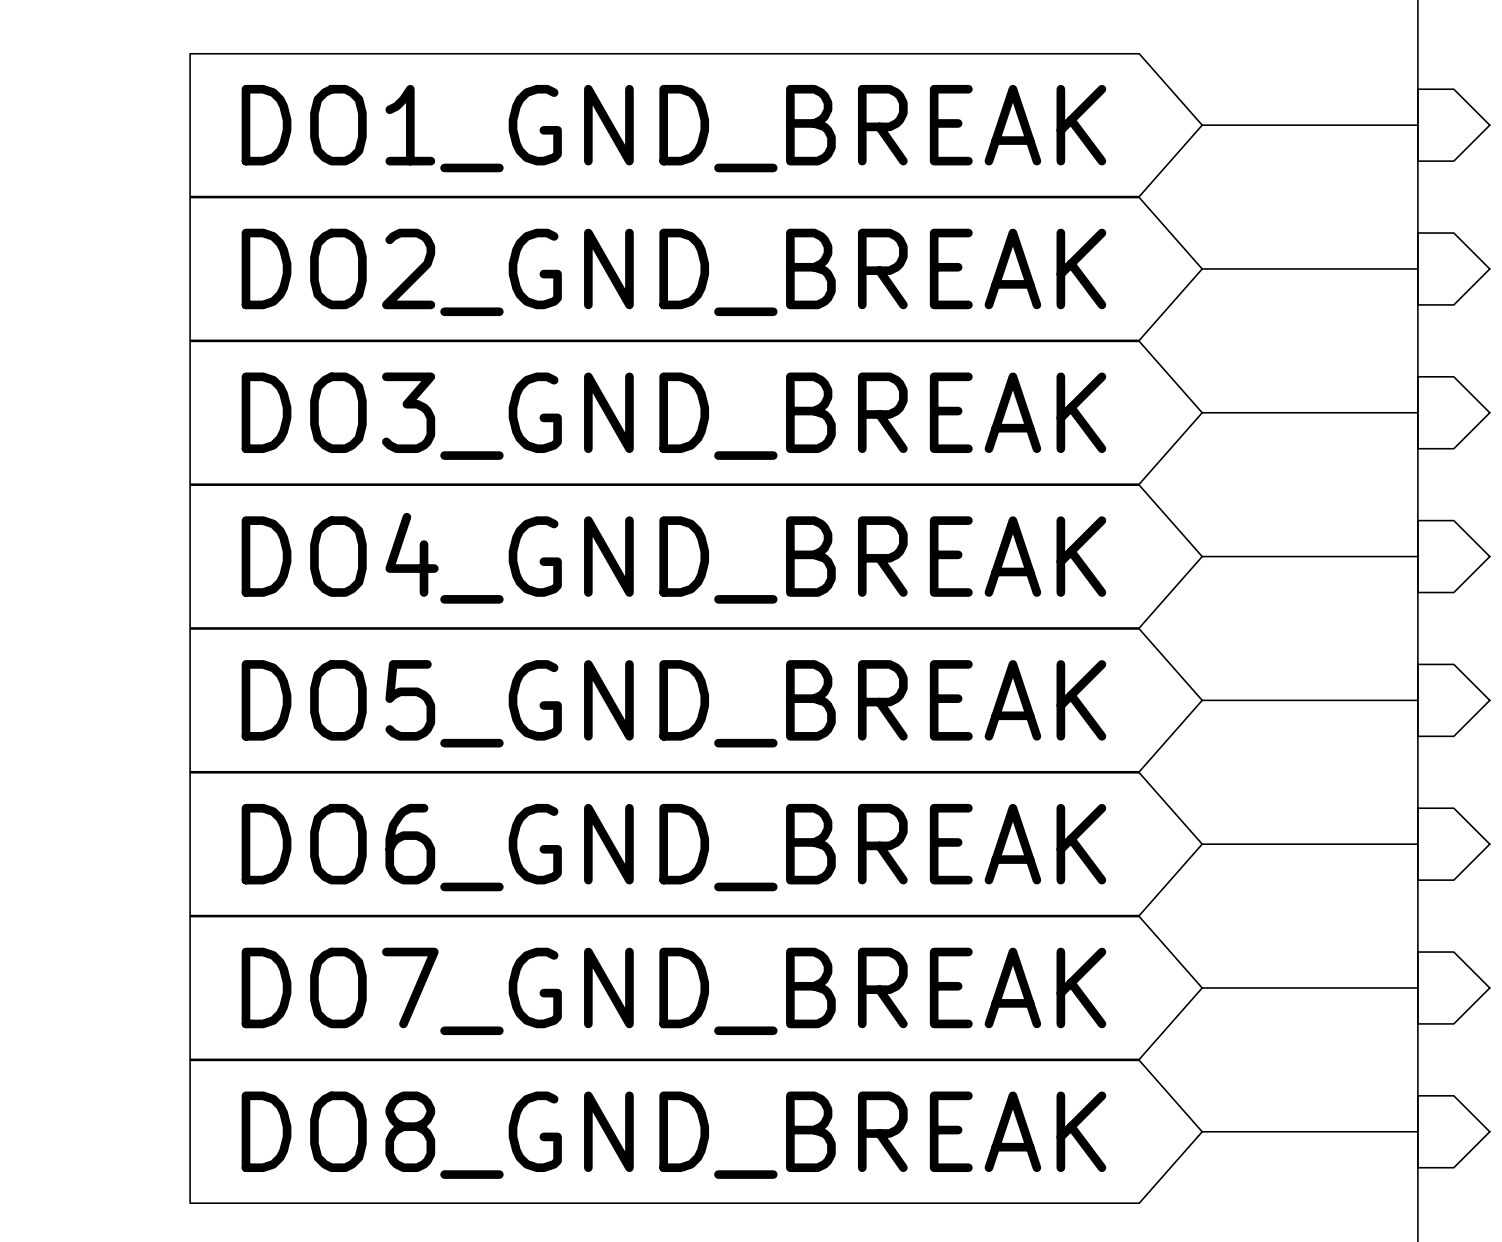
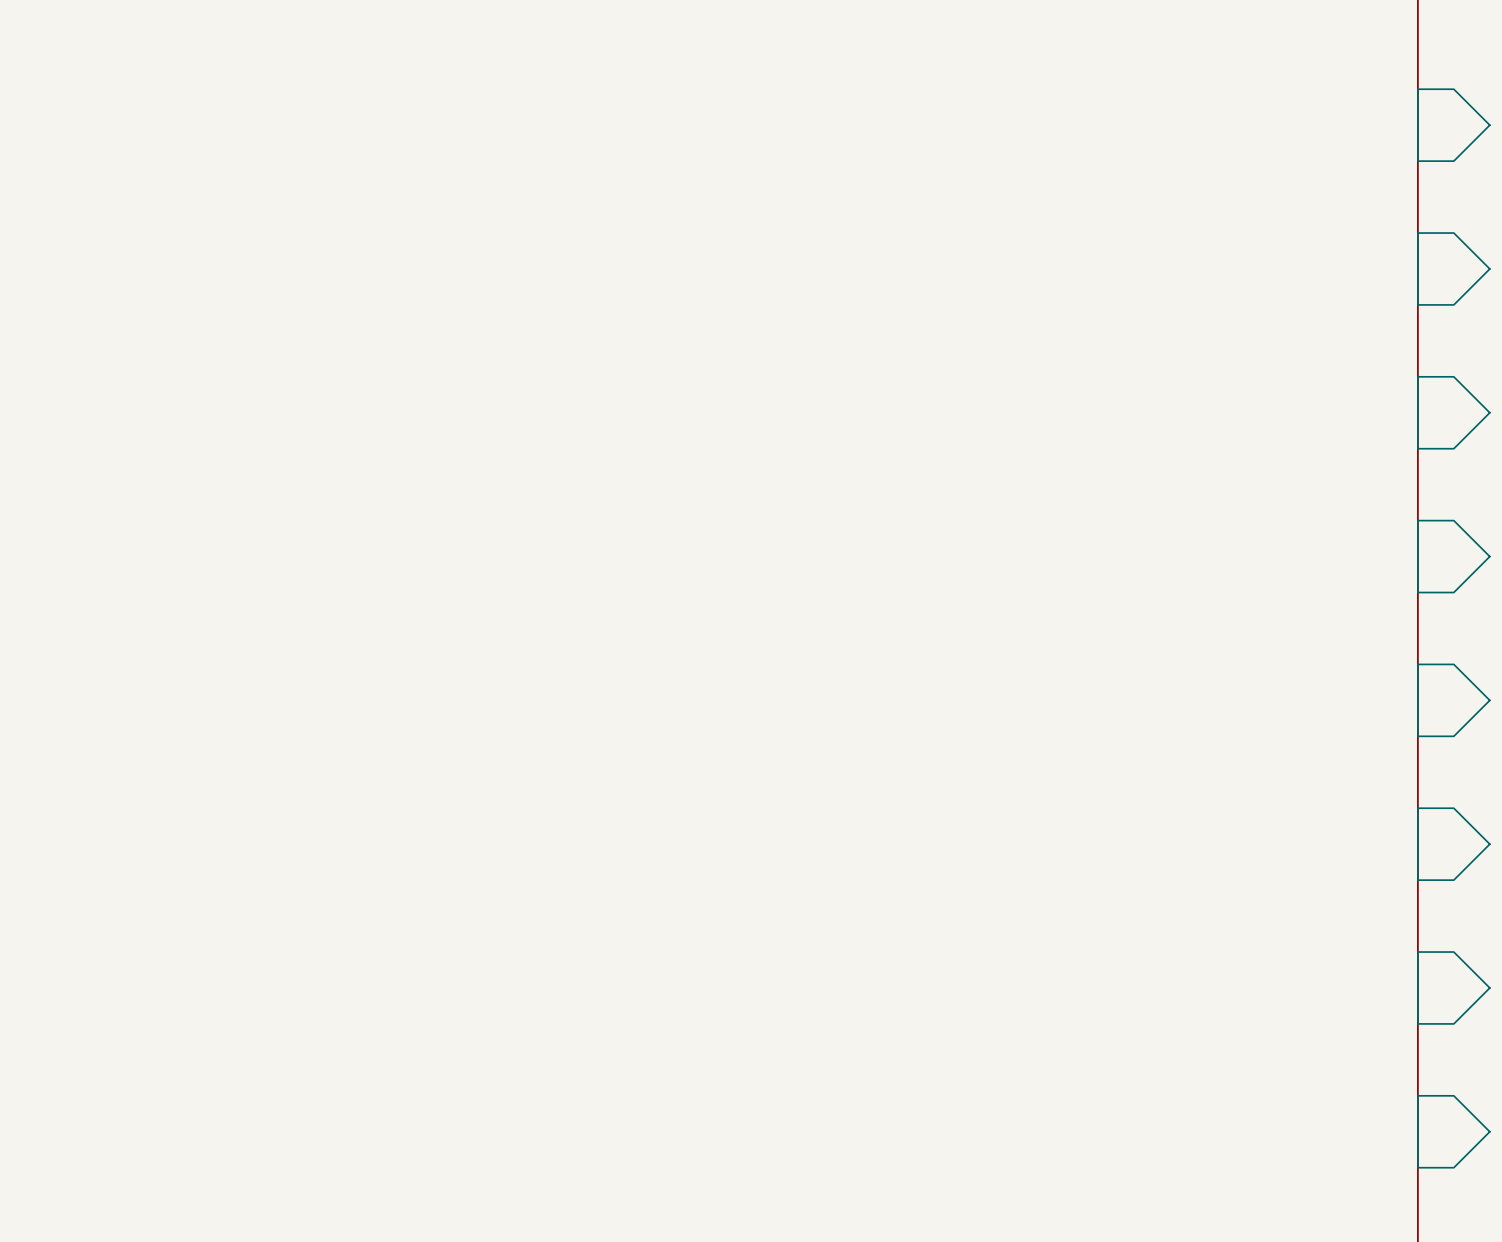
wire: (1202, 125) (1417, 125) -> none
global label: DO1_GND_BREAK (673, 128) -> none
wire: (1202, 268) (1417, 268) -> none
global label: DO2_GND_BREAK (673, 272) -> none
wire: (1202, 412) (1417, 412) -> none
global label: DO3_GND_BREAK (673, 416) -> none
wire: (1202, 556) (1417, 556) -> none
global label: DO4_GND_BREAK (673, 558) -> none
wire: (1202, 700) (1417, 700) -> none
global label: DO5_GND_BREAK (673, 703) -> none
wire: (1202, 844) (1417, 844) -> none
global label: DO6_GND_BREAK (673, 847) -> none
wire: (1202, 987) (1417, 987) -> none
global label: DO7_GND_BREAK (673, 991) -> none
wire: (1202, 1131) (1417, 1131) -> none
global label: DO8_GND_BREAK (673, 1135) -> none

